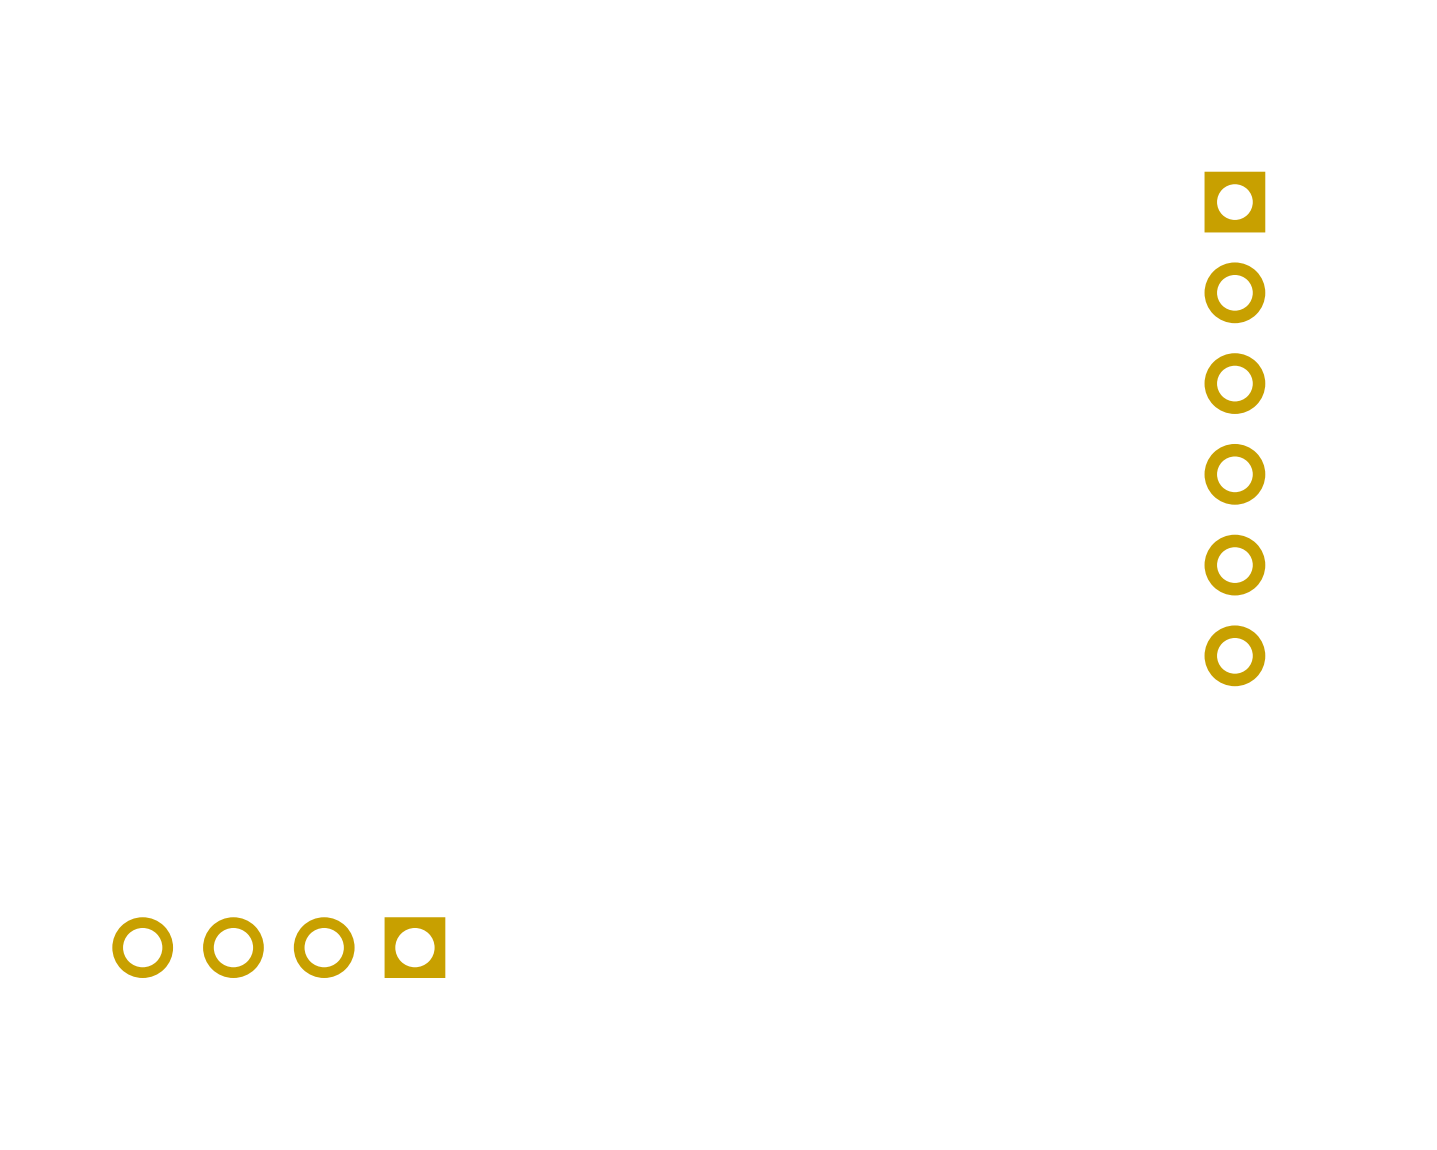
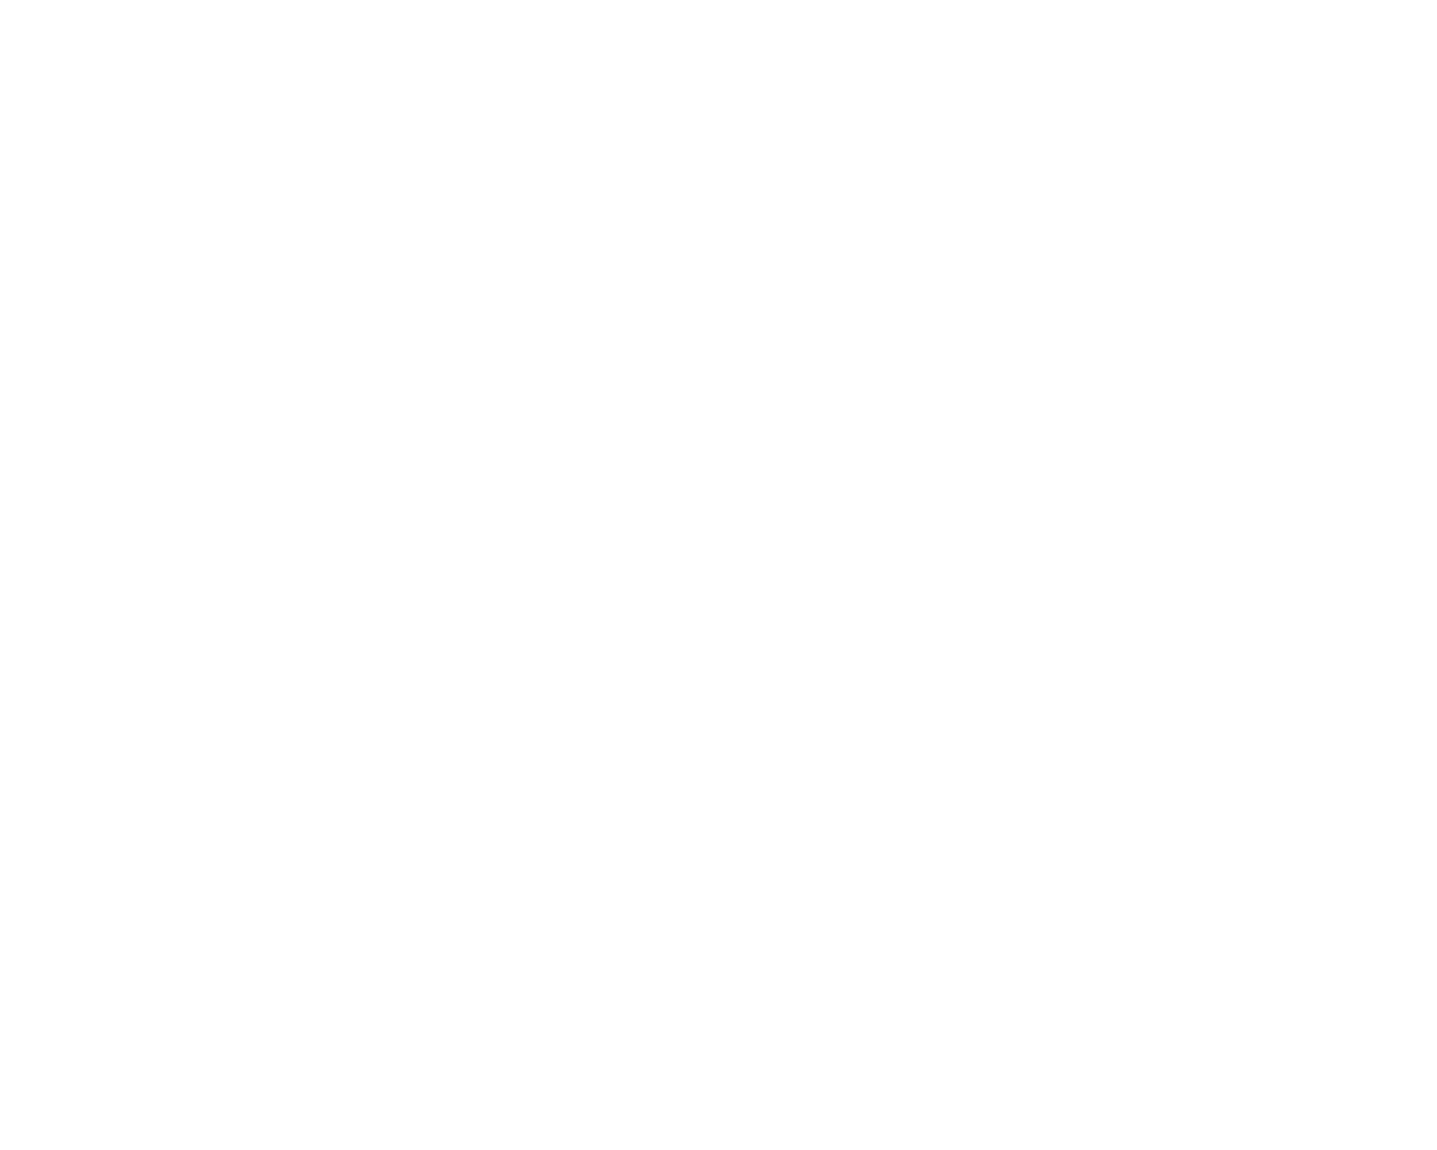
part: (1234, 428) -> none
part: (278, 947) -> none

